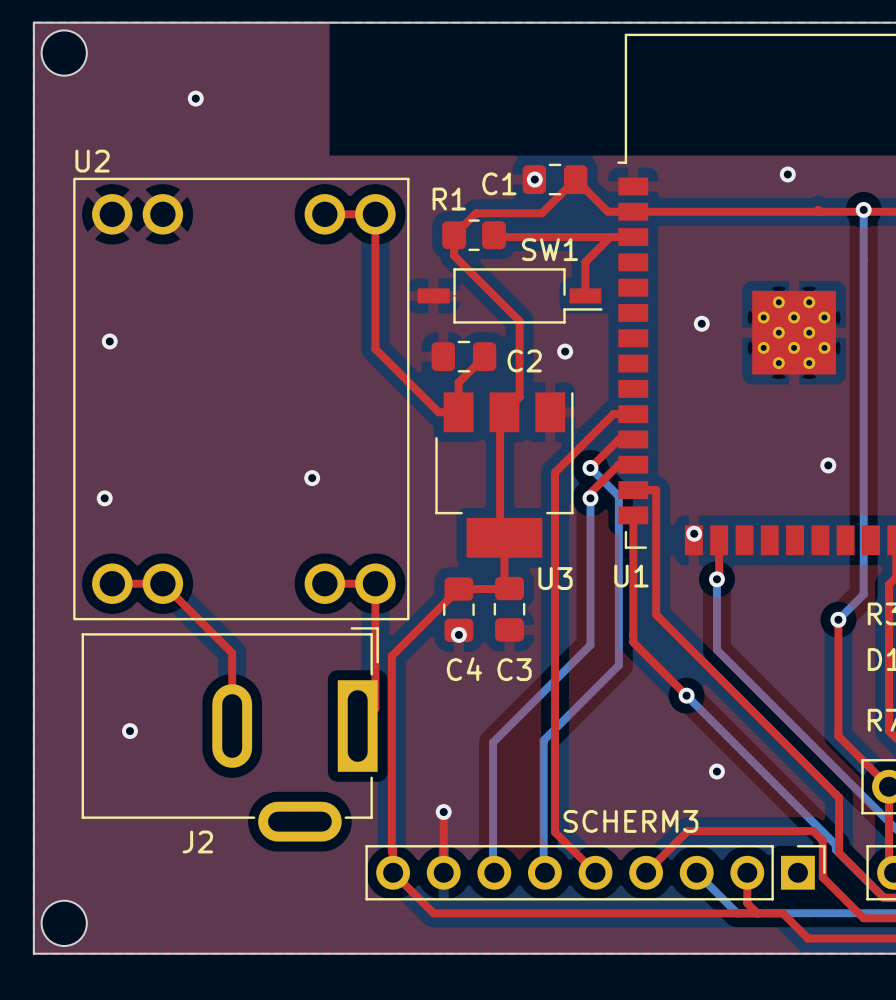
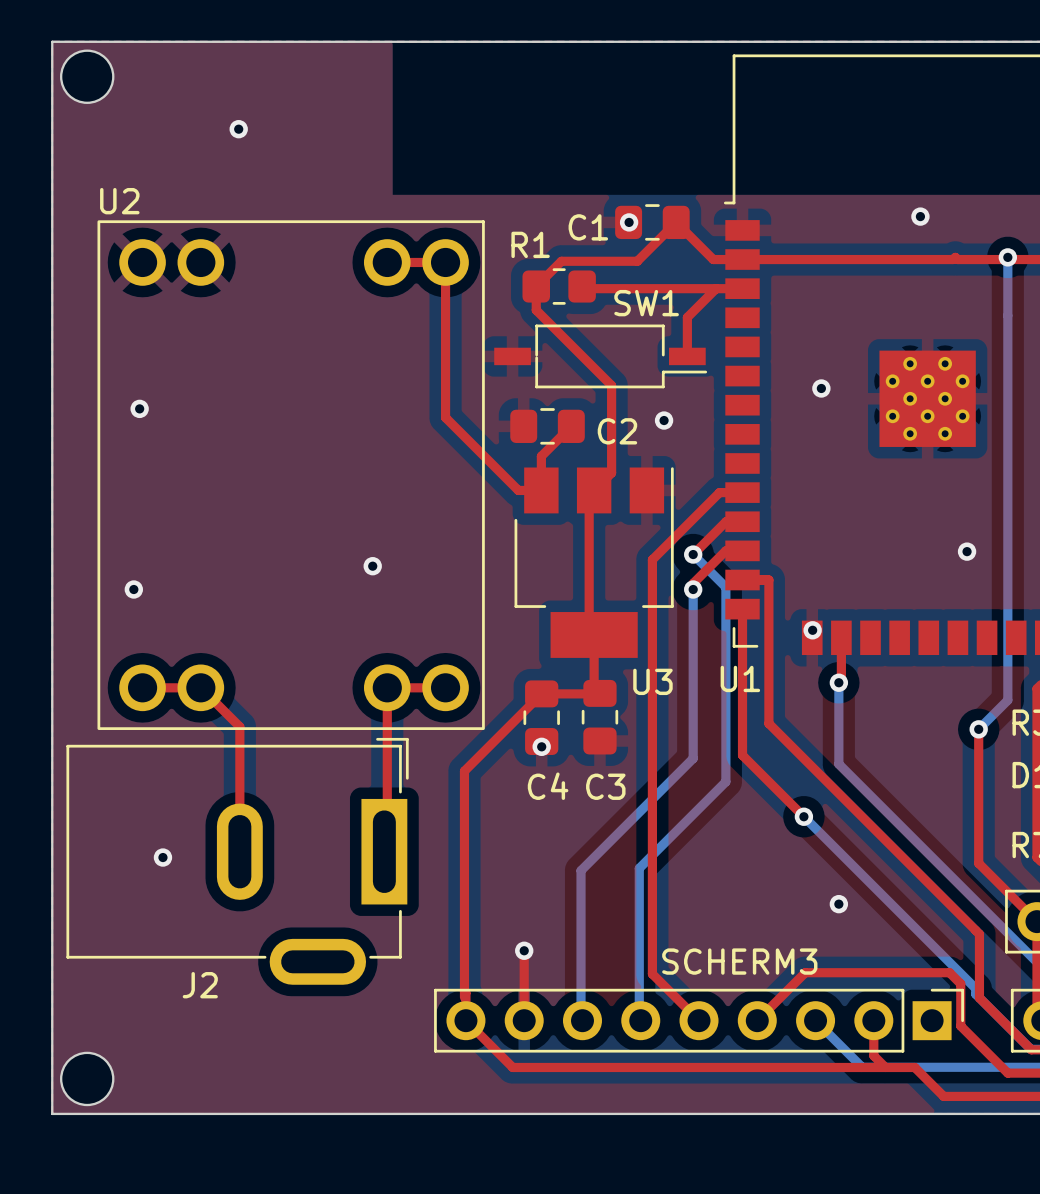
top track: none -> (387, 687) (387, 848) (384, 851)
top track: (375, 583) (375, 708) (357, 726) -> none
top track: (196, 617) (232, 653) (232, 726) -> (239, 726) (239, 851)
J2 position: (230, 734) -> (237, 861)

